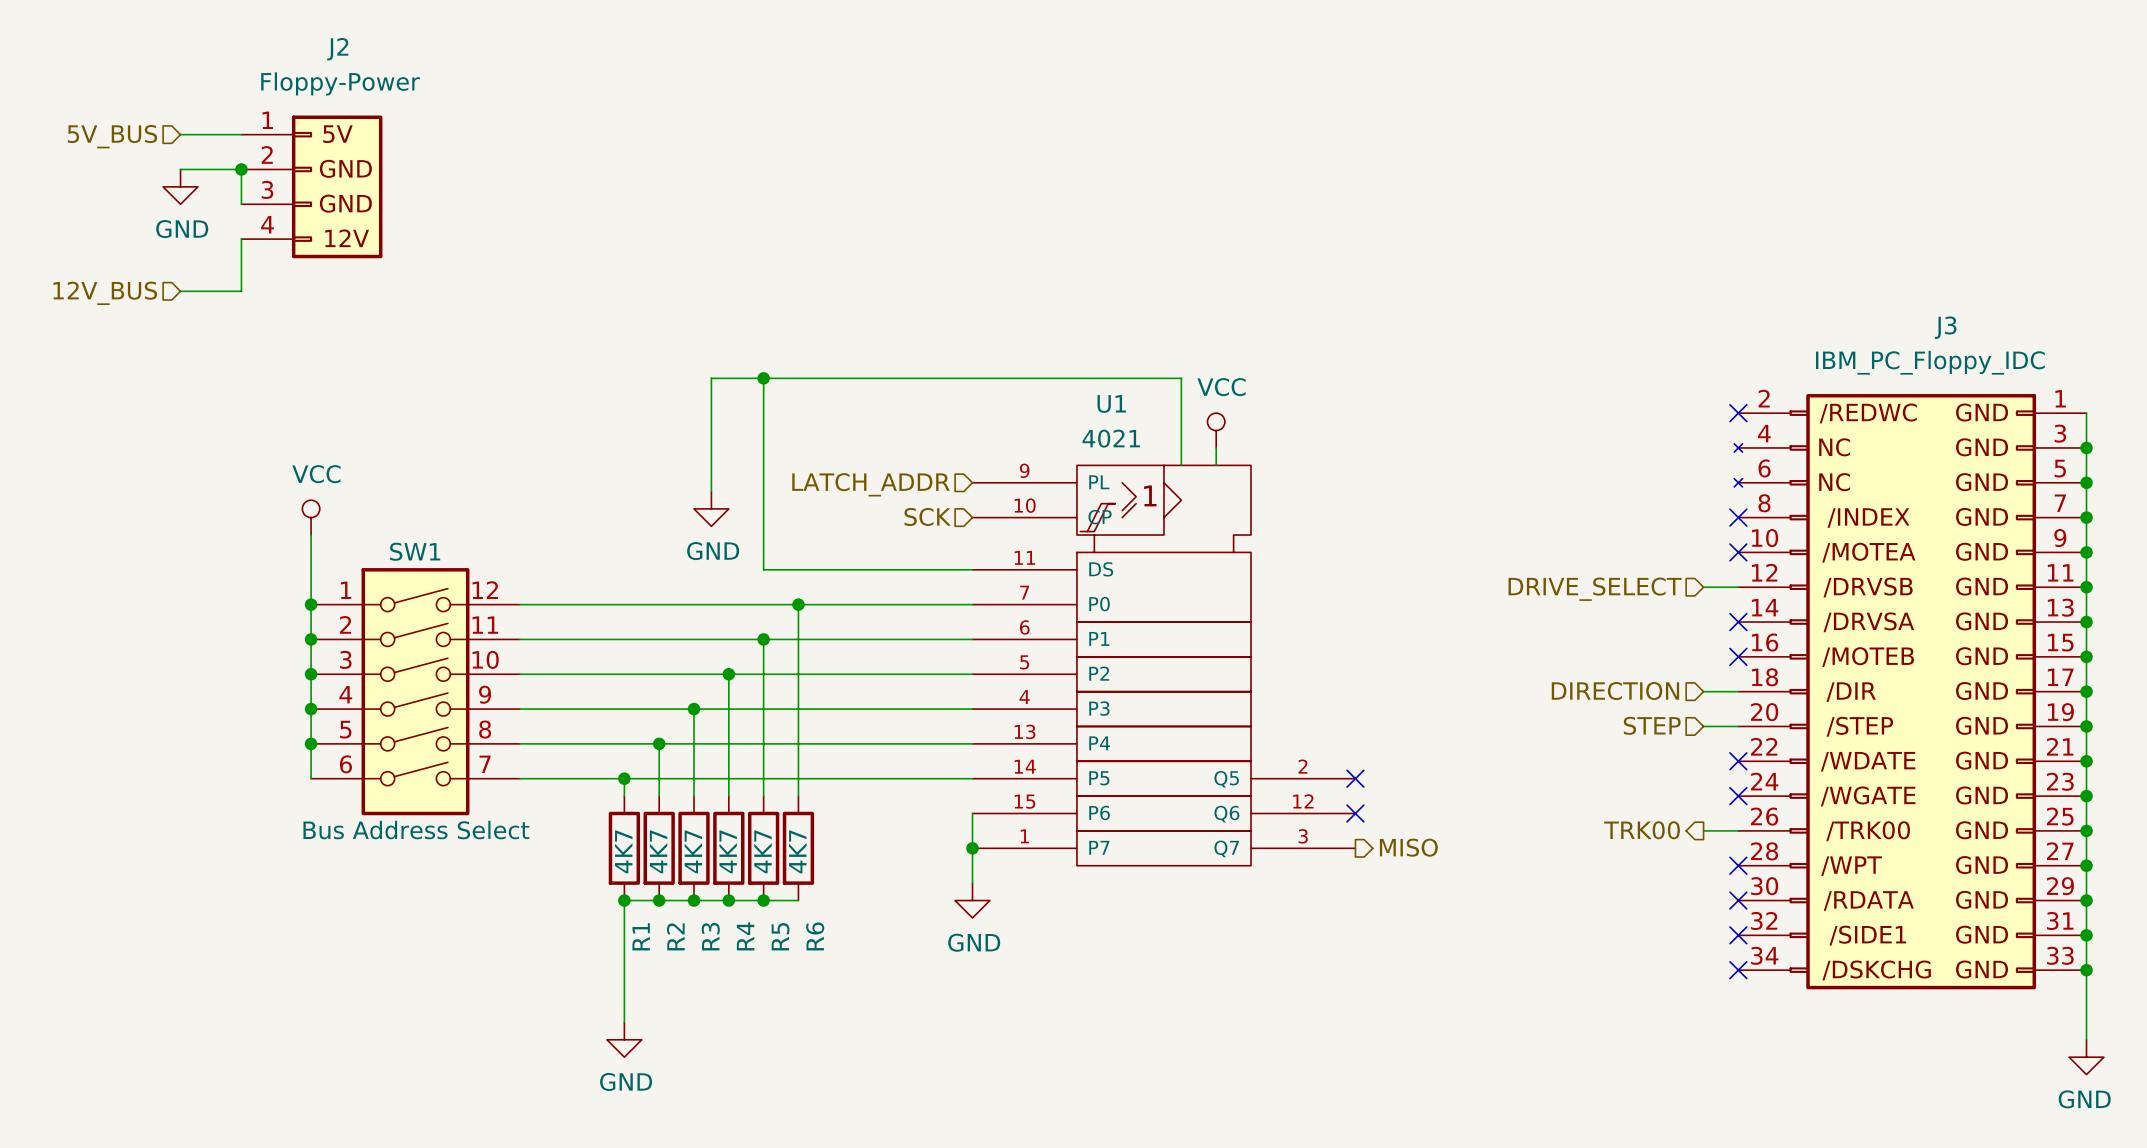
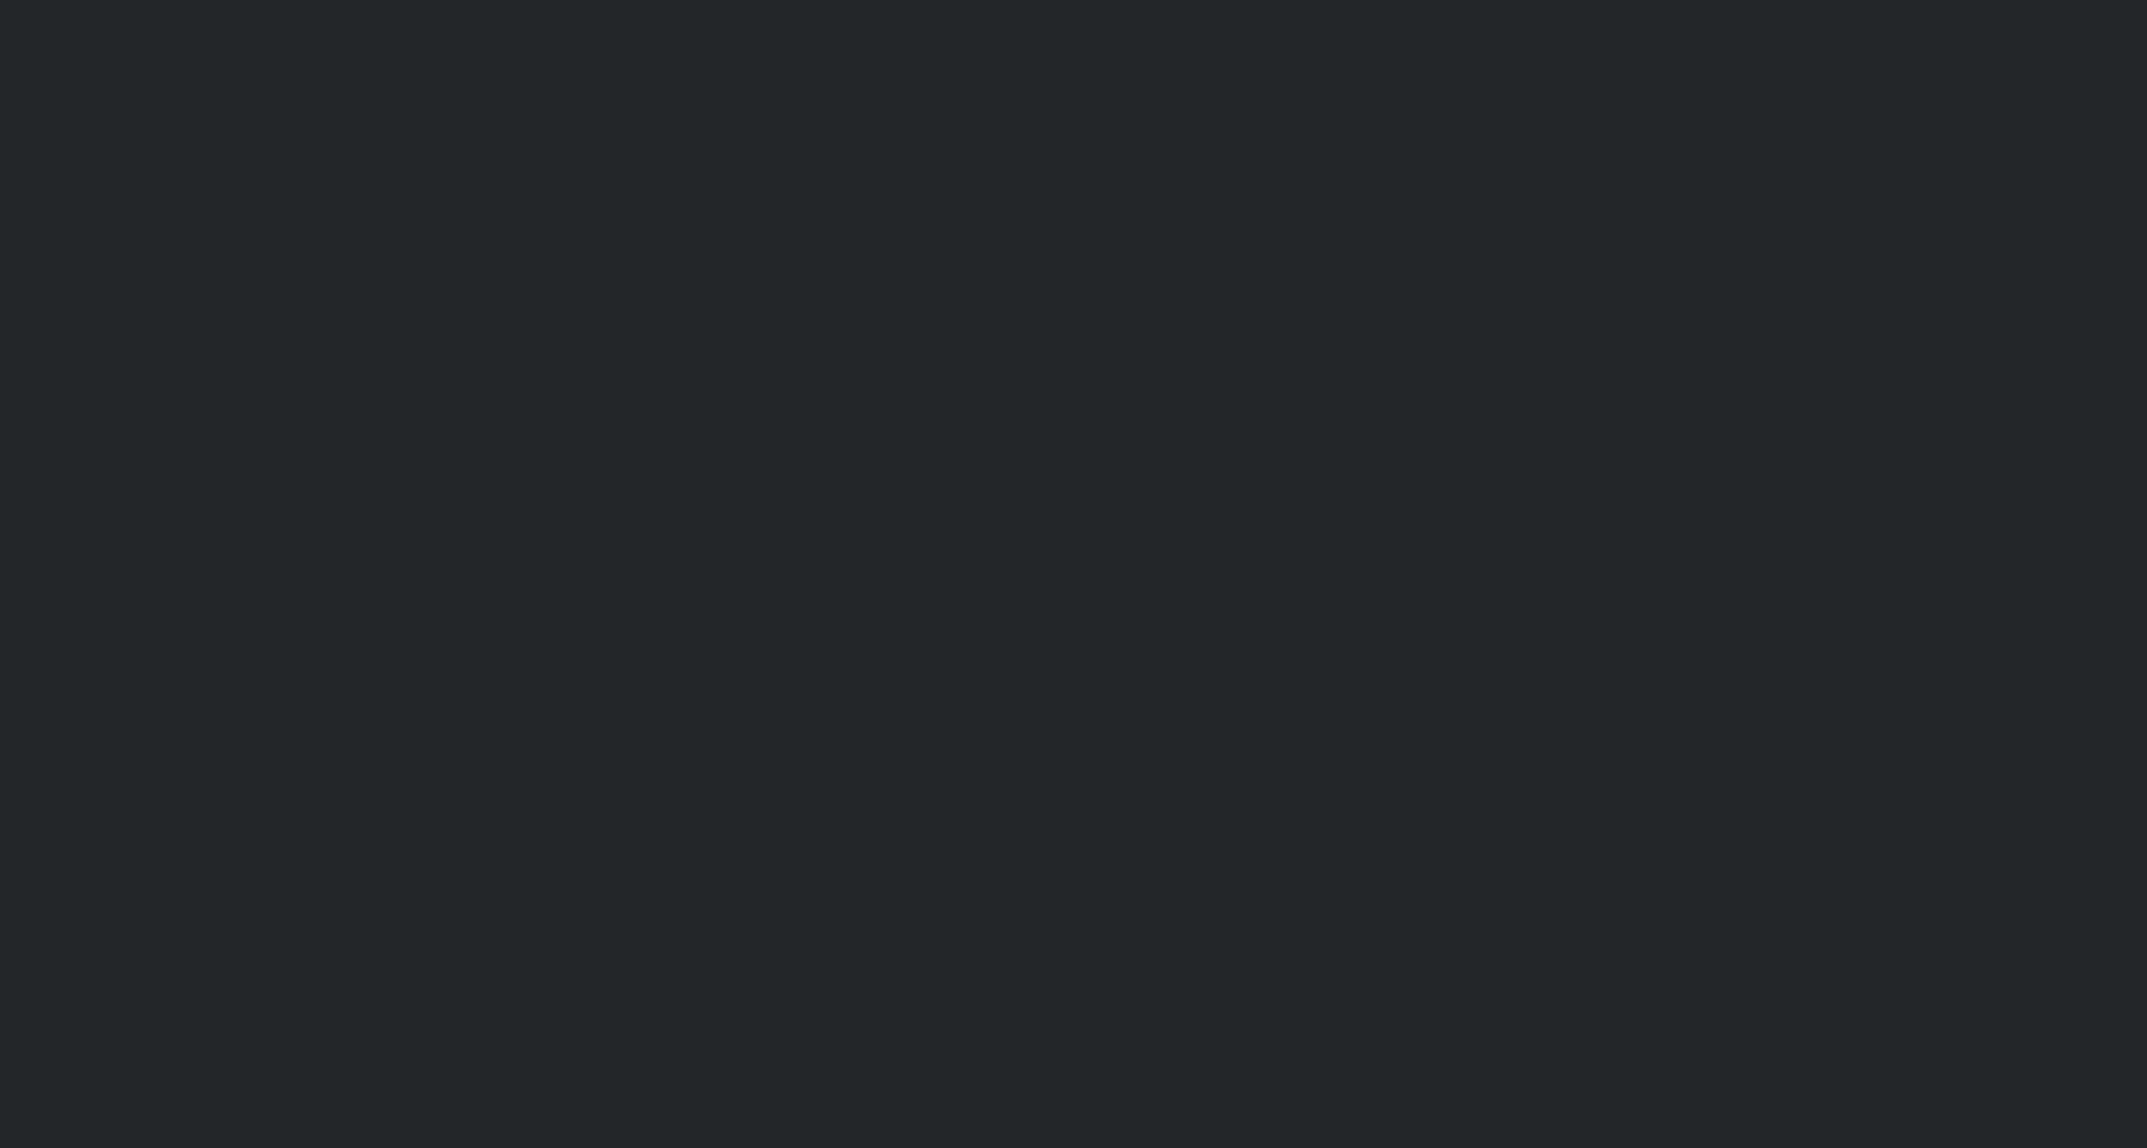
wire: (180, 134) (241, 134) -> none
hierarchical label: 5V_BUS (112, 136) -> none
wire: (180, 169) (241, 169) (241, 204) -> none
junction: (241, 169) -> none
power symbol: GND (180, 186) -> none
J2: Floppy-Power (311, 186) -> none
wire: (241, 239) (241, 291) (180, 291) -> none
hierarchical label: 12V_BUS (105, 293) -> none
wire: (763, 378) (763, 569) (972, 569) -> none
junction: (763, 378) -> none
no-connect mark: (1738, 413) -> none
wire: (2086, 413) (2086, 1039) -> none
power symbol: VCC (1216, 430) -> none
wire: (1216, 447) (1216, 465) -> none
junction: (2086, 447) -> none
wire: (1181, 465) (1181, 378) (711, 378) (711, 491) -> none
junction: (2086, 482) -> none
hierarchical label: LATCH_ADDR (871, 484) -> none
power symbol: GND (711, 508) -> none
hierarchical label: SCK (927, 516) -> none
power symbol: VCC (311, 517) -> none
no-connect mark: (1738, 517) -> none
junction: (2086, 517) -> none
wire: (311, 535) (311, 778) -> none
no-connect mark: (1738, 552) -> none
junction: (2086, 552) -> none
wire: (1703, 587) (1738, 587) -> none
junction: (2086, 587) -> none
hierarchical label: DRIVE_SELECT (1595, 589) -> none
junction: (311, 604) -> none
wire: (519, 604) (972, 604) -> none
wire: (798, 604) (798, 796) -> none
junction: (798, 604) -> none
no-connect mark: (1738, 622) -> none
junction: (2086, 622) -> none
junction: (311, 639) -> none
wire: (519, 639) (972, 639) -> none
wire: (763, 639) (763, 796) -> none
junction: (763, 639) -> none
no-connect mark: (1738, 656) -> none
junction: (2086, 656) -> none
U1: 4021 (1163, 665) -> none
junction: (311, 674) -> none
wire: (519, 674) (972, 674) -> none
wire: (728, 674) (728, 796) -> none
junction: (728, 674) -> none
SW1: Bus Address Select (415, 691) -> none
hierarchical label: DIRECTION (1615, 691) -> none
wire: (1703, 691) (1738, 691) -> none
J3: IBM_PC_Floppy_IDC (1910, 691) -> none
junction: (2086, 691) -> none
junction: (311, 709) -> none
wire: (519, 709) (972, 709) -> none
wire: (694, 709) (694, 796) -> none
junction: (694, 709) -> none
hierarchical label: STEP (1652, 725) -> none
wire: (1703, 726) (1738, 726) -> none
junction: (2086, 726) -> none
junction: (311, 743) -> none
wire: (519, 743) (972, 743) -> none
wire: (659, 743) (659, 796) -> none
junction: (659, 743) -> none
no-connect mark: (1738, 761) -> none
junction: (2086, 761) -> none
wire: (519, 778) (972, 778) -> none
wire: (624, 778) (624, 796) -> none
junction: (624, 778) -> none
no-connect mark: (1355, 778) -> none
no-connect mark: (1738, 796) -> none
junction: (2086, 796) -> none
wire: (972, 813) (972, 883) -> none
no-connect mark: (1355, 813) -> none
hierarchical label: TRK00 (1642, 830) -> none
wire: (1703, 830) (1738, 830) -> none
junction: (2086, 830) -> none
hierarchical label: MISO (1408, 847) -> none
R1: 4K7 (624, 848) -> none
R2: 4K7 (659, 848) -> none
R3: 4K7 (694, 848) -> none
R4: 4K7 (728, 848) -> none
R5: 4K7 (763, 848) -> none
R6: 4K7 (798, 848) -> none
junction: (972, 848) -> none
no-connect mark: (1738, 865) -> none
junction: (2086, 865) -> none
junction: (624, 900) -> none
junction: (659, 900) -> none
junction: (694, 900) -> none
junction: (728, 900) -> none
junction: (763, 900) -> none
wire: (798, 900) (624, 900) (624, 1022) -> none
power symbol: GND (972, 900) -> none
no-connect mark: (1738, 900) -> none
junction: (2086, 900) -> none
no-connect mark: (1738, 935) -> none
junction: (2086, 935) -> none
no-connect mark: (1738, 970) -> none
junction: (2086, 970) -> none
power symbol: GND (624, 1039) -> none
power symbol: GND (2086, 1057) -> none

